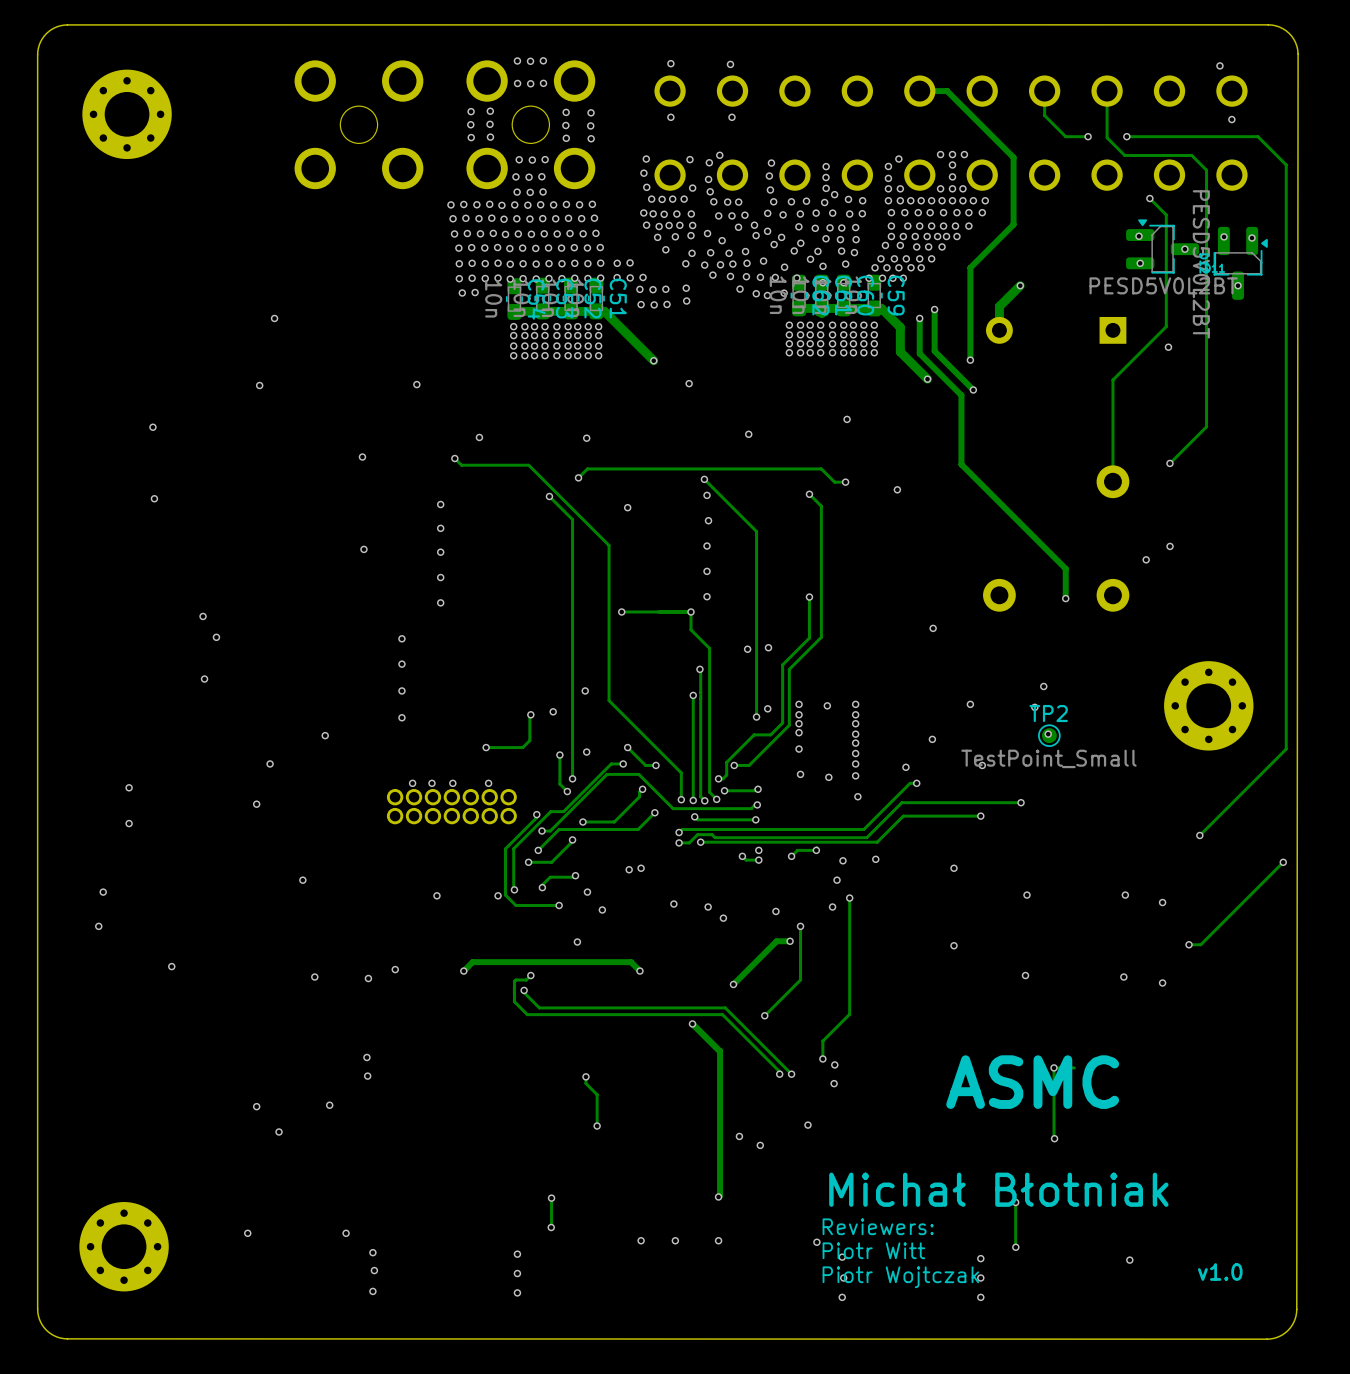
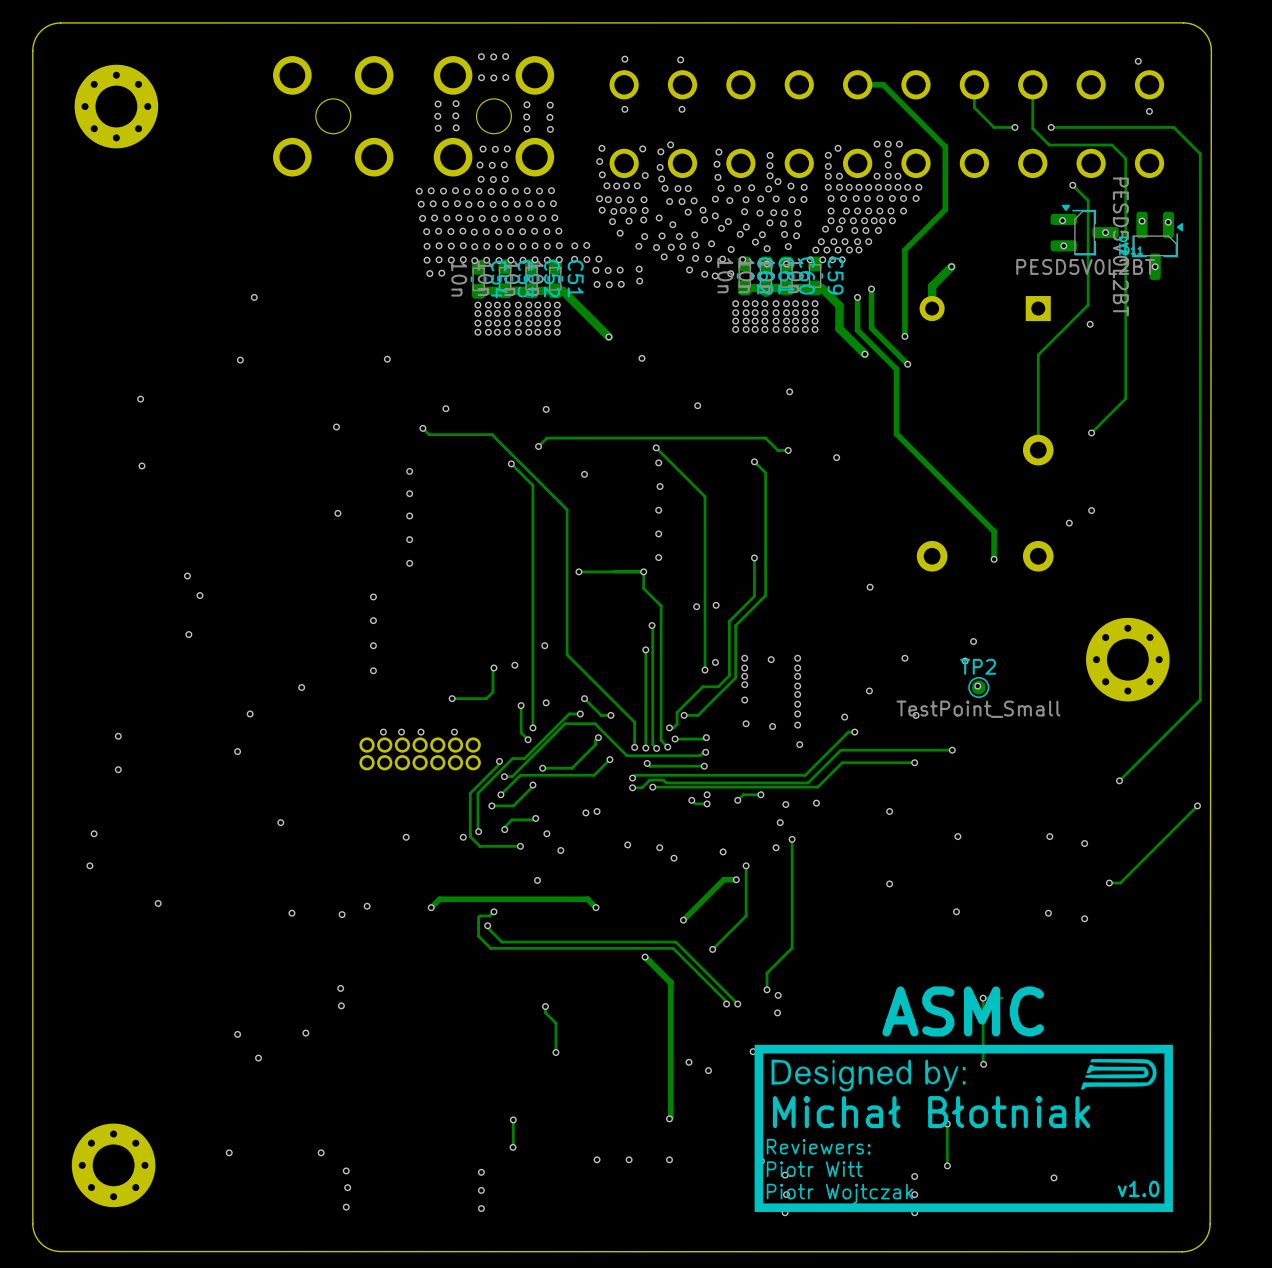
drawing: none -> [754, 1044, 1174, 1213]

